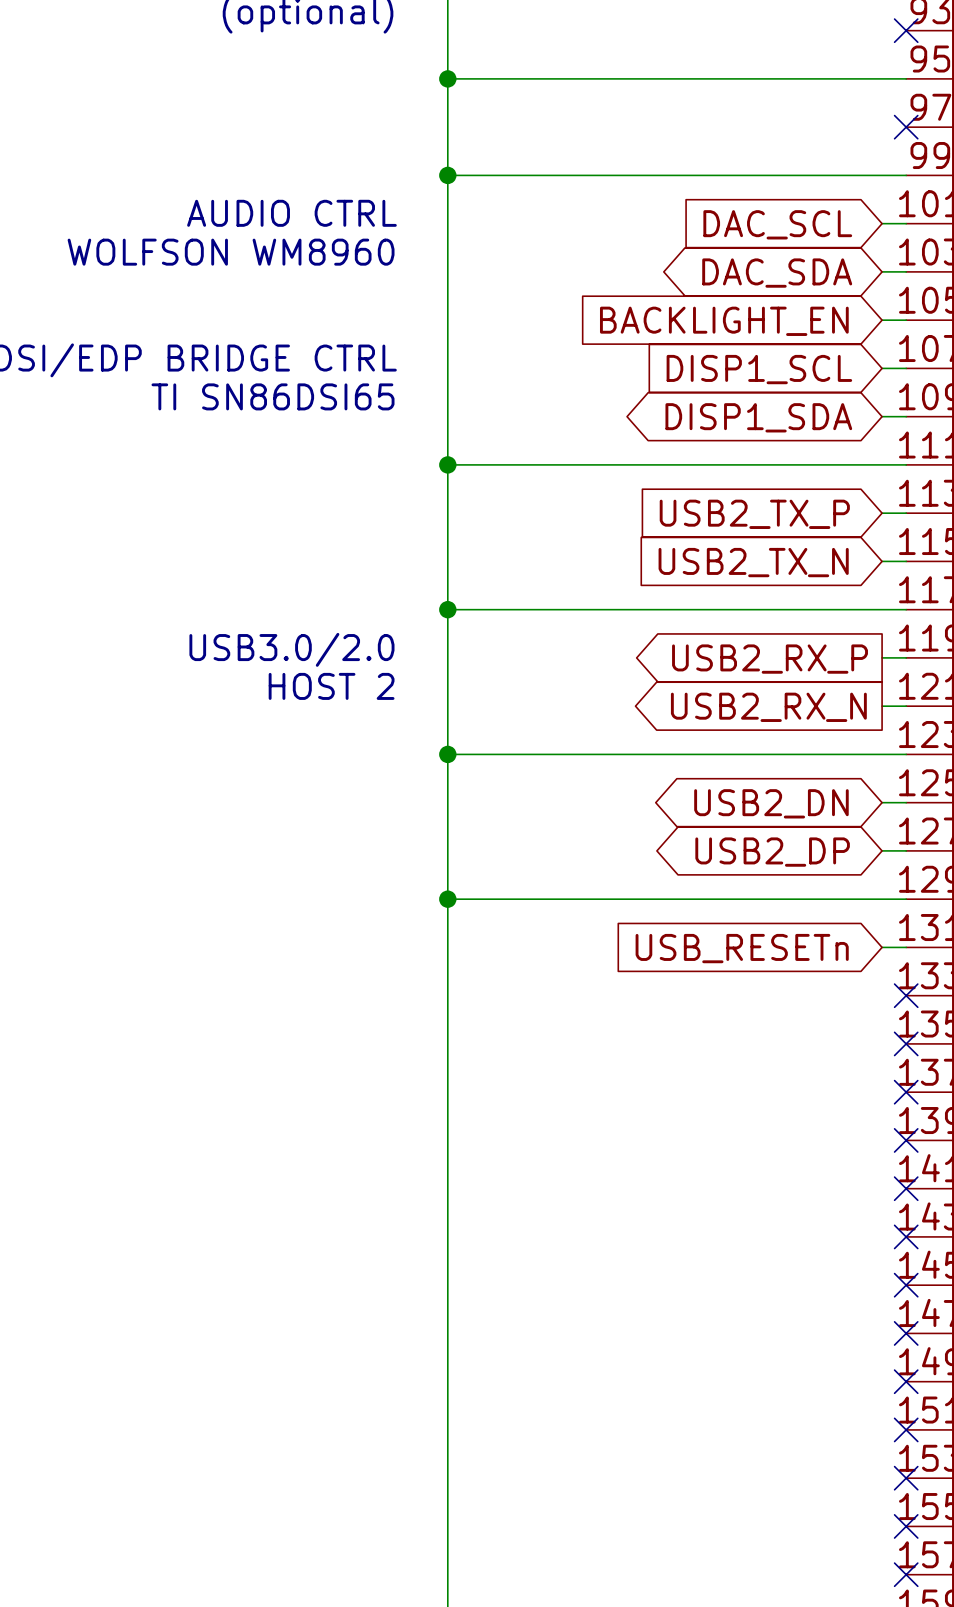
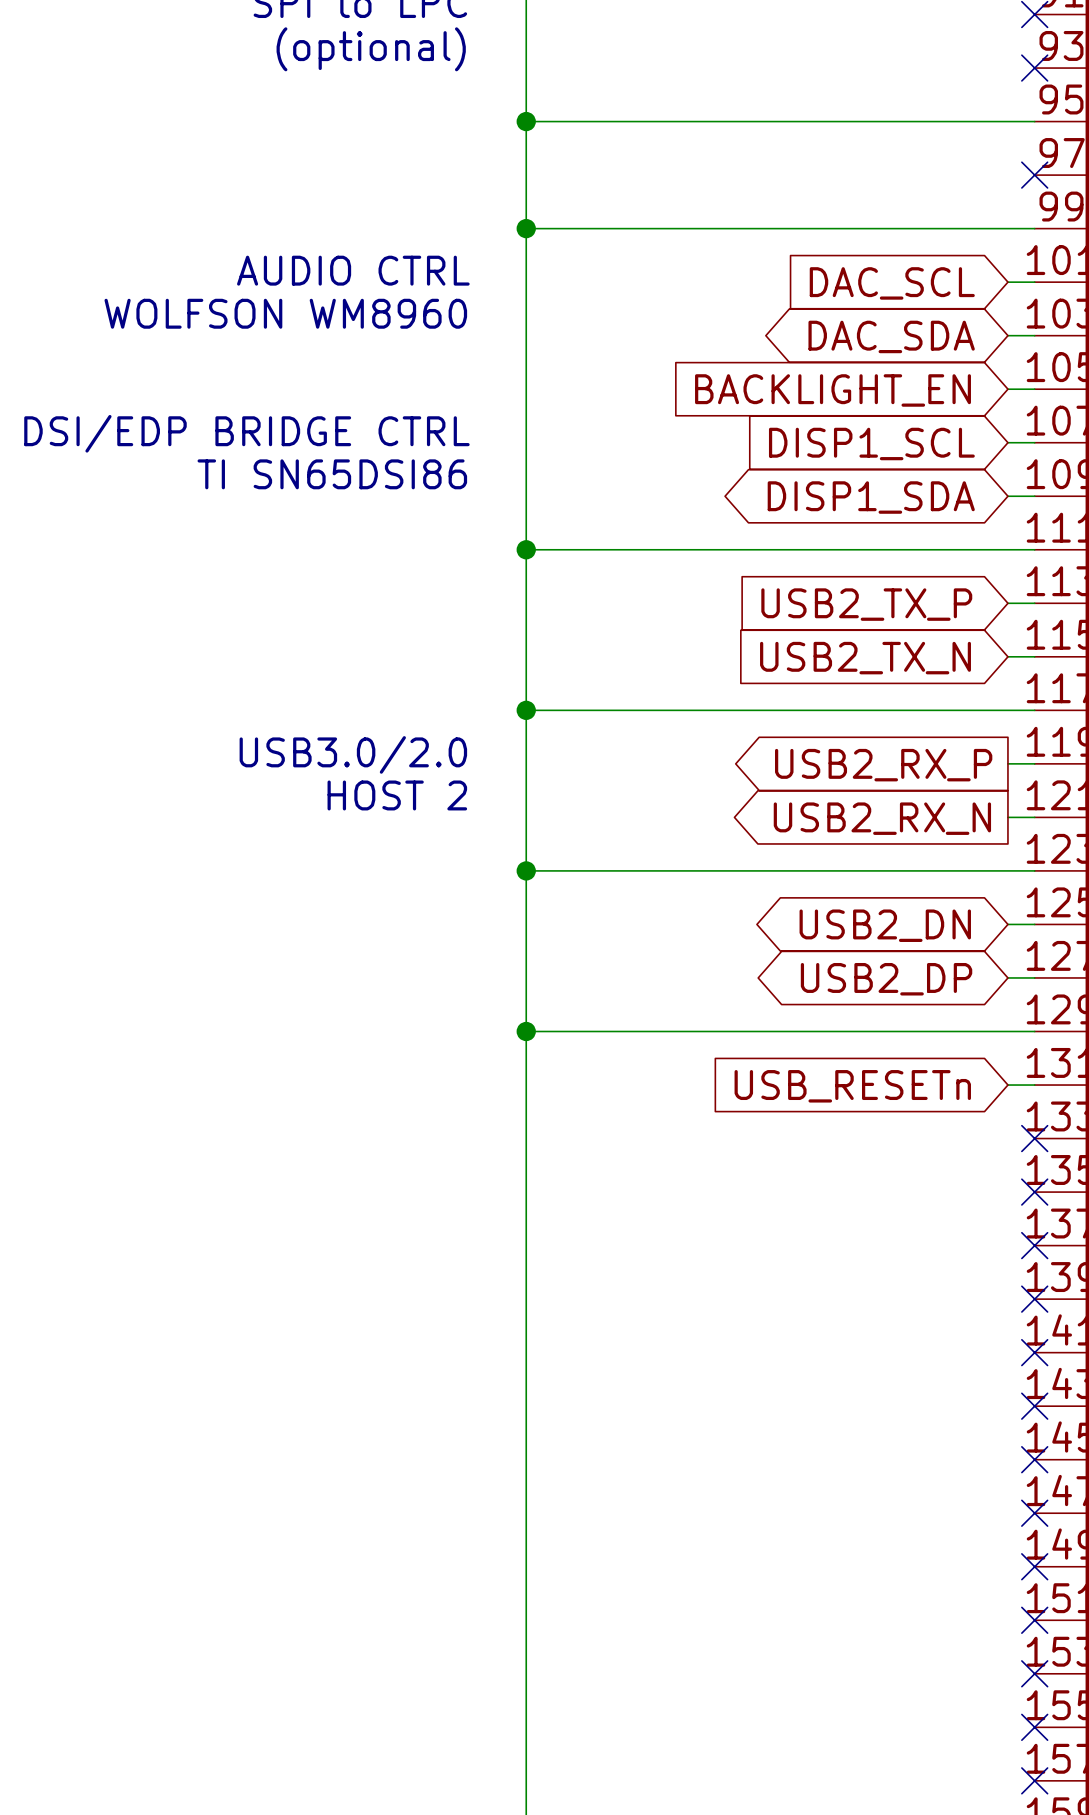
text: TI SN86DSI65 (273, 396) -> TI SN65DSI86 (332, 474)

